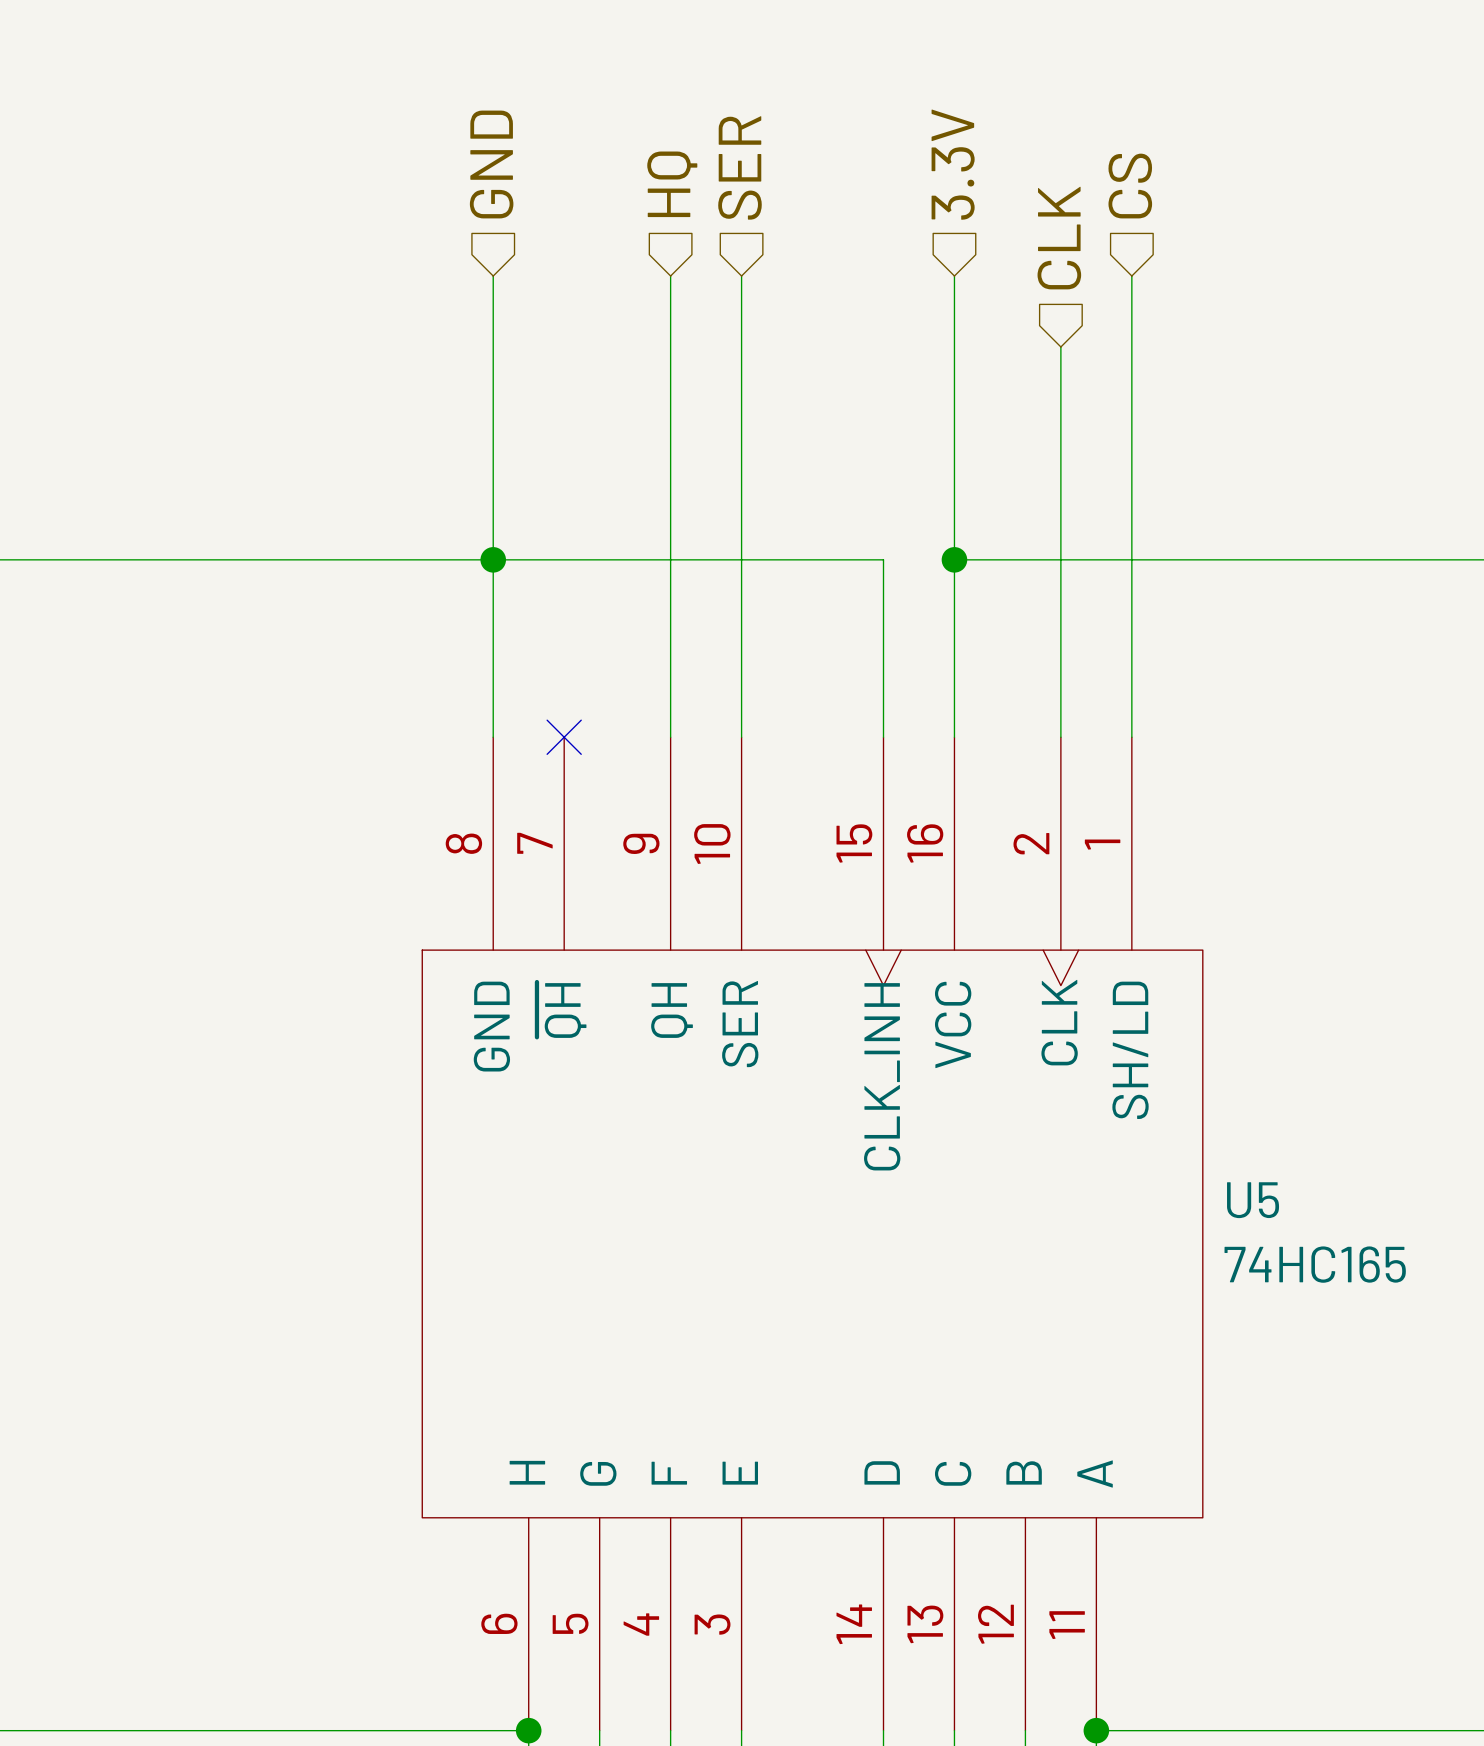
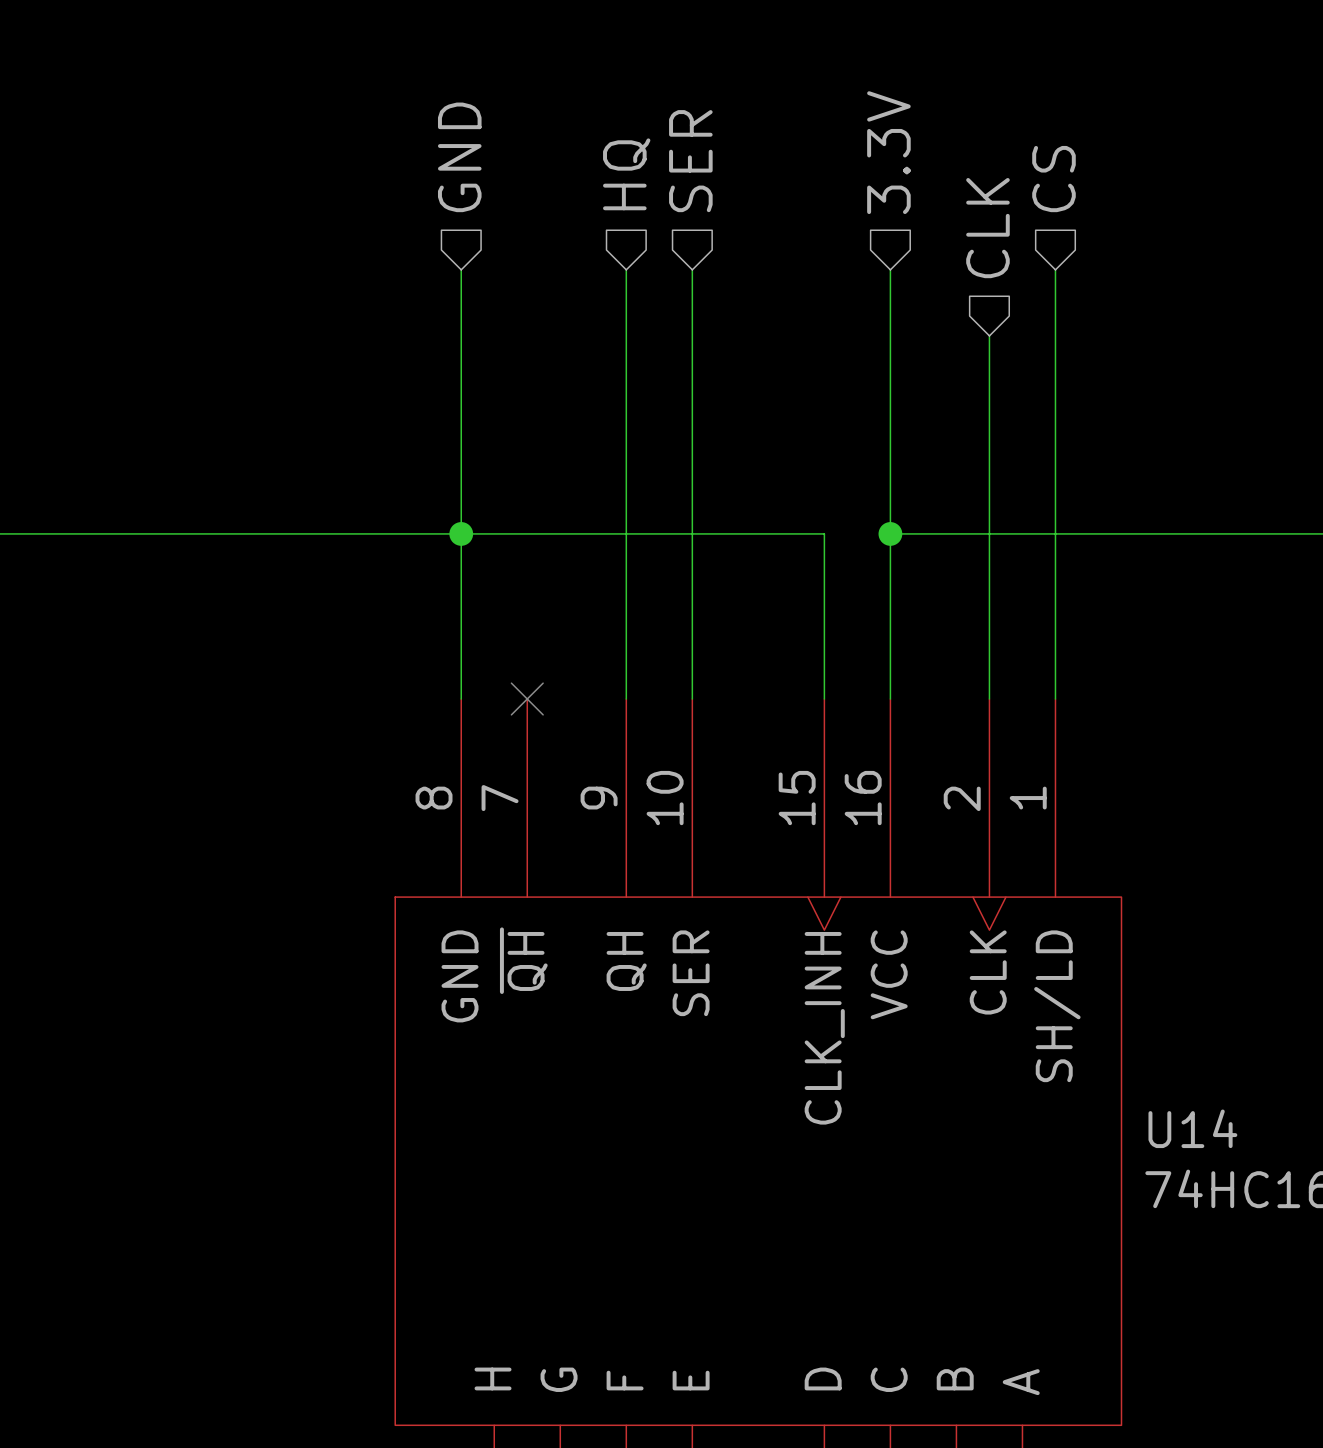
U5 name: U5 (1253, 1200) -> U14 (1192, 1128)

